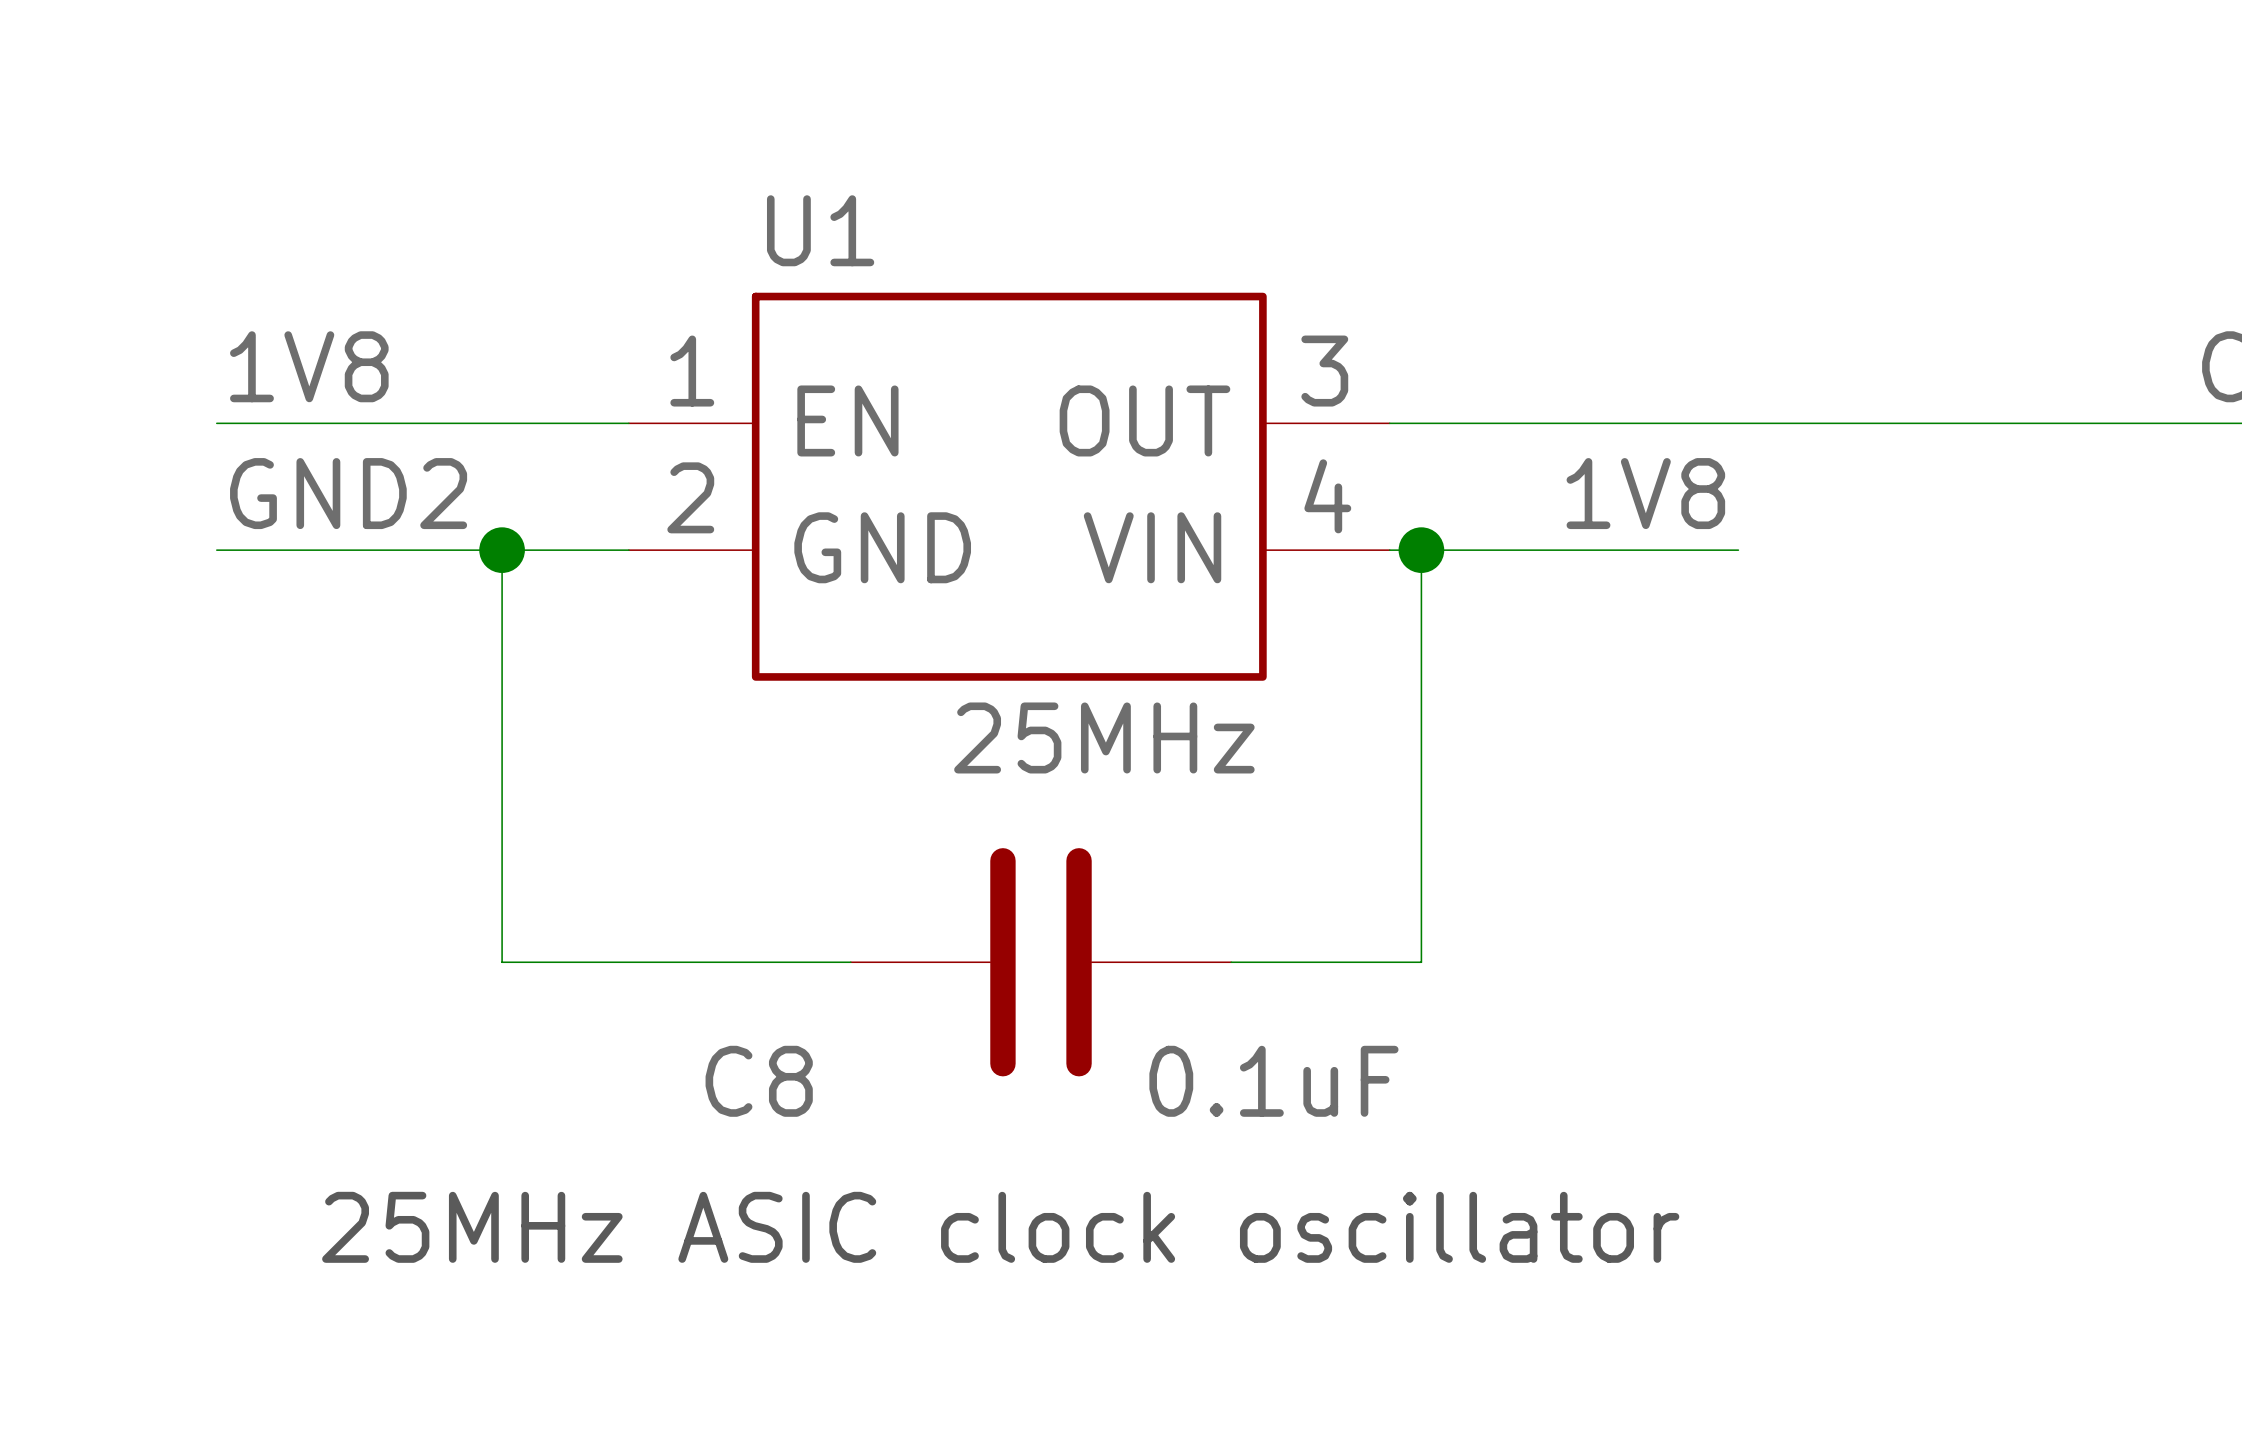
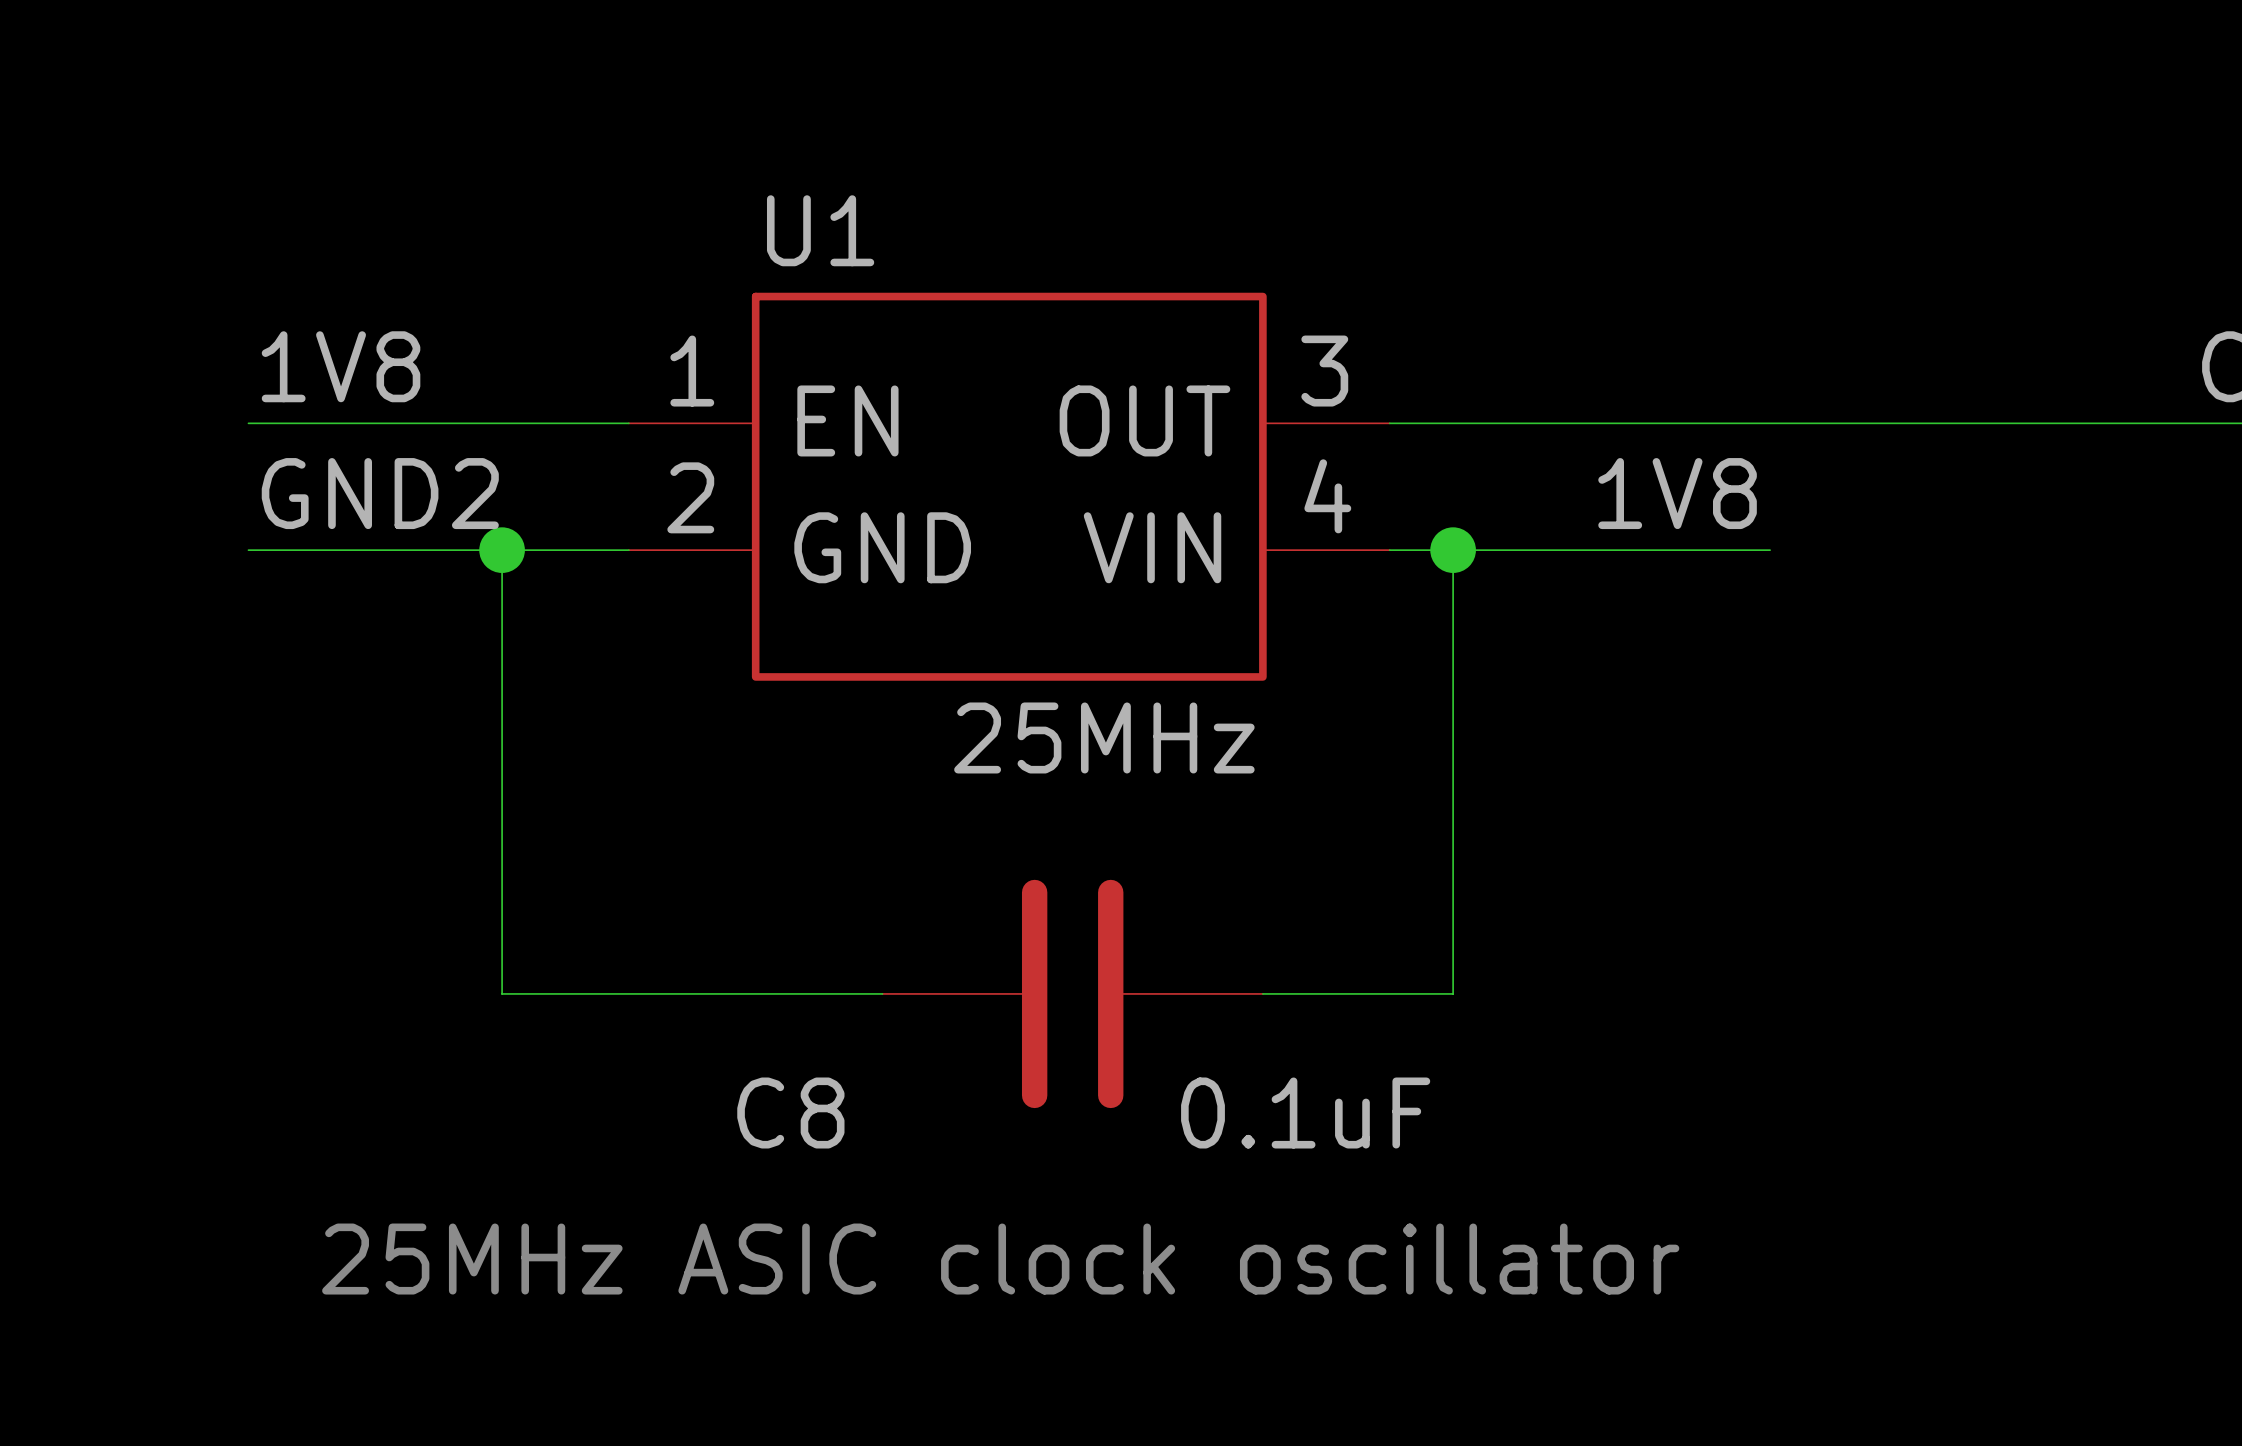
label position: 1V8 (309, 366) -> 1V8 (341, 366)
wire: (216, 423) (248, 423) -> none
label position: GND2 (348, 493) -> GND2 (380, 493)
label position: 1V8 (1645, 493) -> 1V8 (1677, 493)
wire: (216, 550) (248, 550) -> none
wire: (1421, 550) (1421, 962) (1231, 962) -> none
junction position: (1421, 550) -> (1453, 550)
wire: none -> (1453, 550) (1453, 993) (1262, 993)
wire: none -> (1738, 550) (1770, 550)
wire: (502, 962) (850, 962) -> (502, 962) (502, 993) (882, 993)
C8 position: (1040, 962) -> (1072, 993)
text position: 25MHz ASIC clock oscillator (1000, 1227) -> 25MHz ASIC clock oscillator (1000, 1259)

